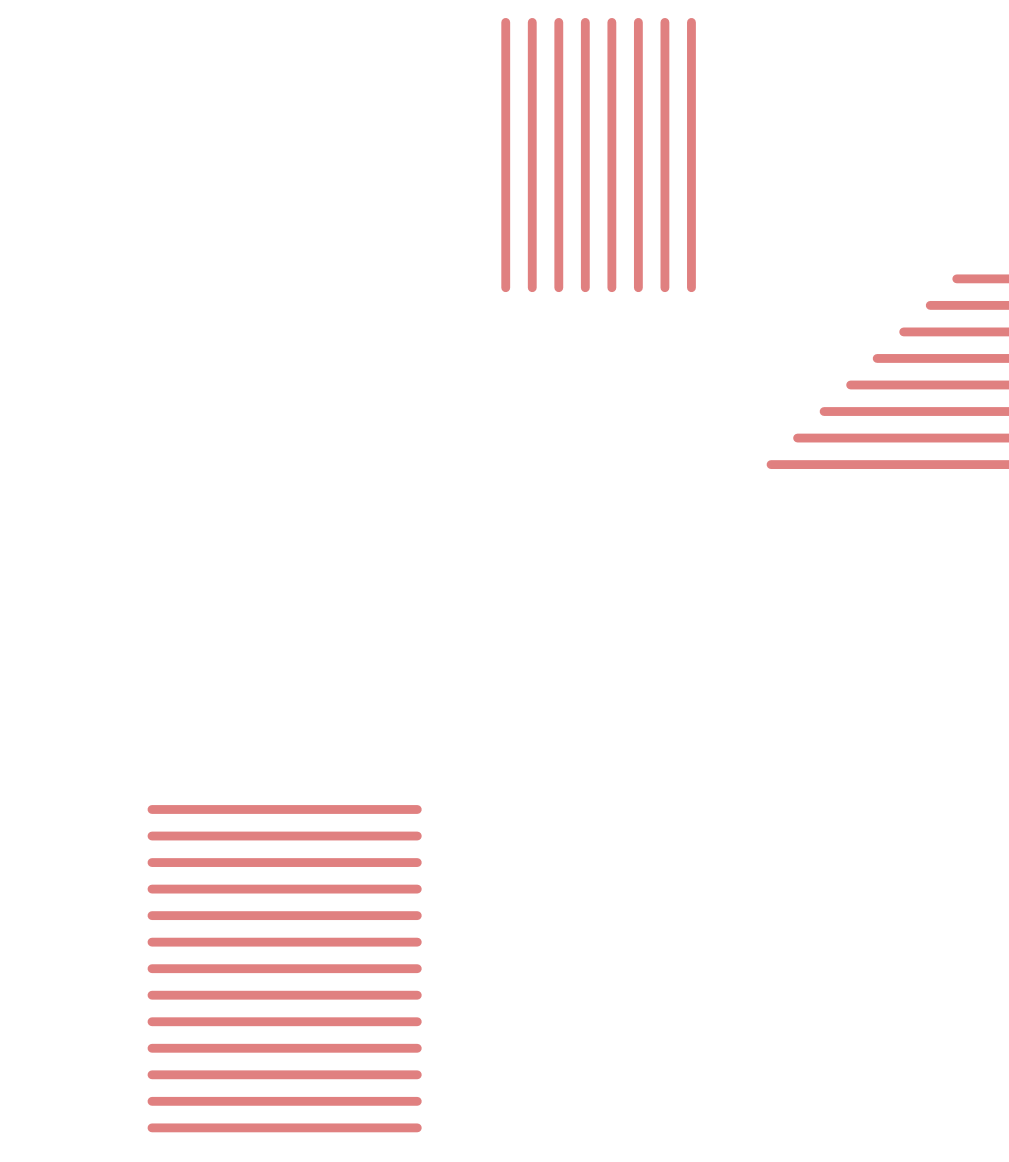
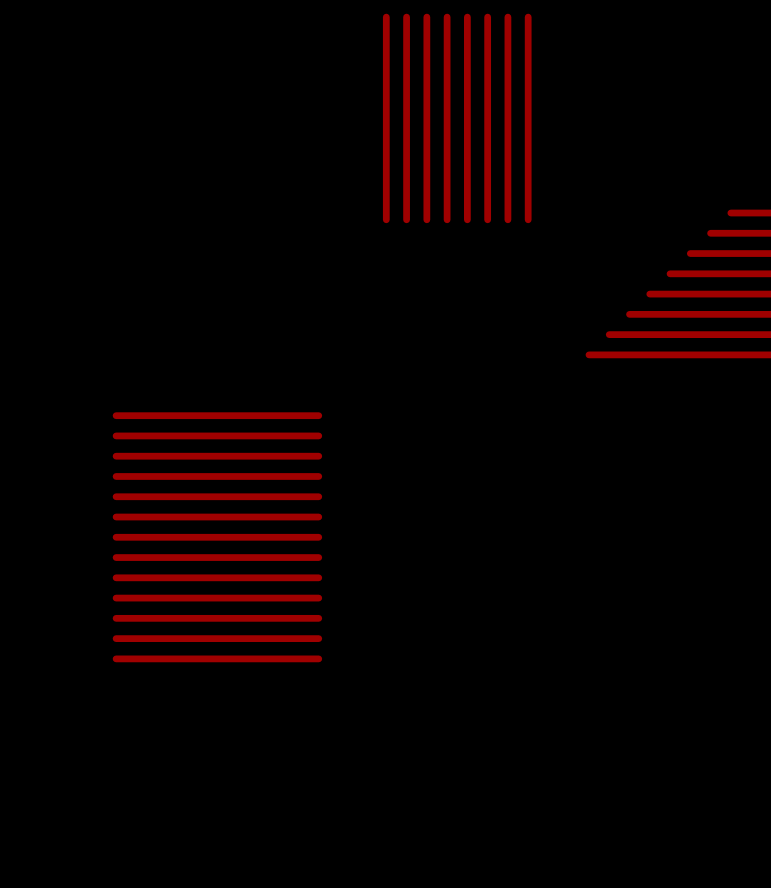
top track: (417, 889) (151, 889) -> (318, 415) (116, 415)
top track: (417, 915) (151, 915) -> (318, 435) (116, 435)
top track: (417, 942) (151, 942) -> (318, 456) (116, 456)
top track: (417, 968) (151, 968) -> (318, 476) (116, 476)
top track: (417, 995) (151, 995) -> (318, 496) (116, 496)
top track: (417, 1021) (151, 1021) -> (318, 517) (116, 517)
top track: (417, 1048) (151, 1048) -> (318, 537) (116, 537)
top track: (417, 1074) (151, 1074) -> (318, 557) (116, 557)
top track: (417, 1101) (151, 1101) -> (318, 577) (116, 577)
top track: (417, 1127) (151, 1127) -> (318, 598) (116, 598)

